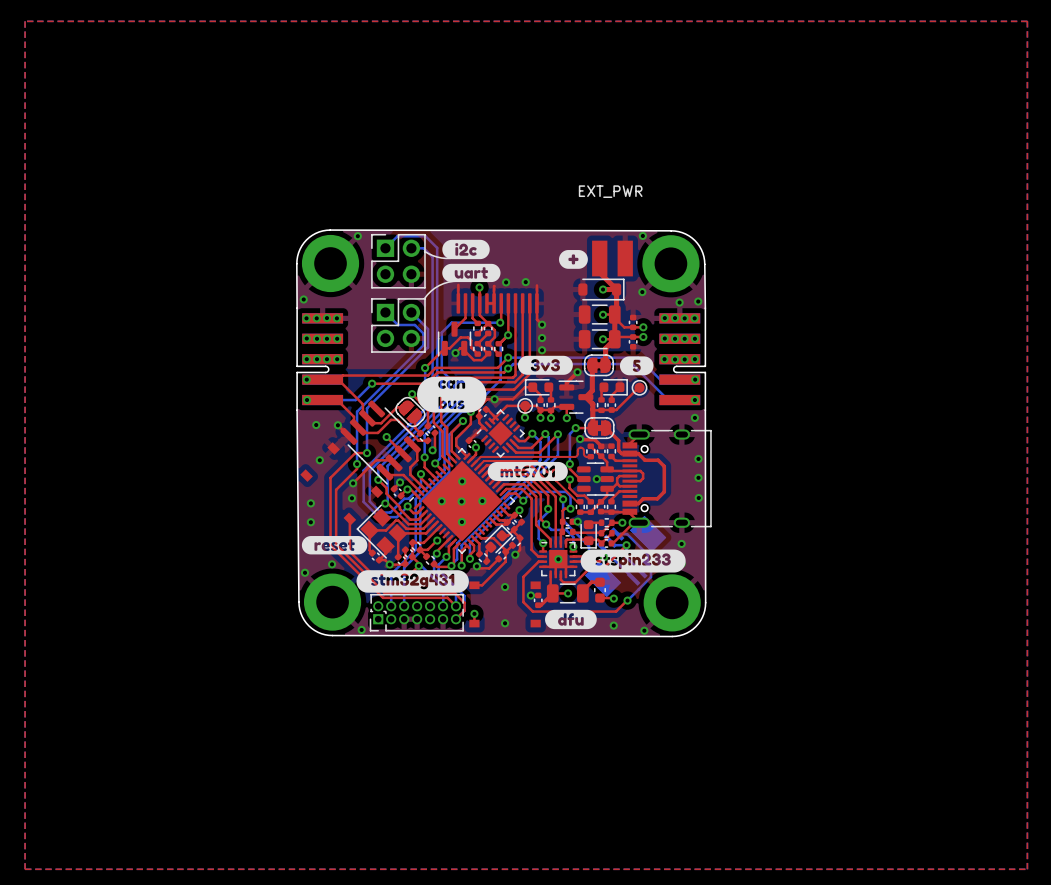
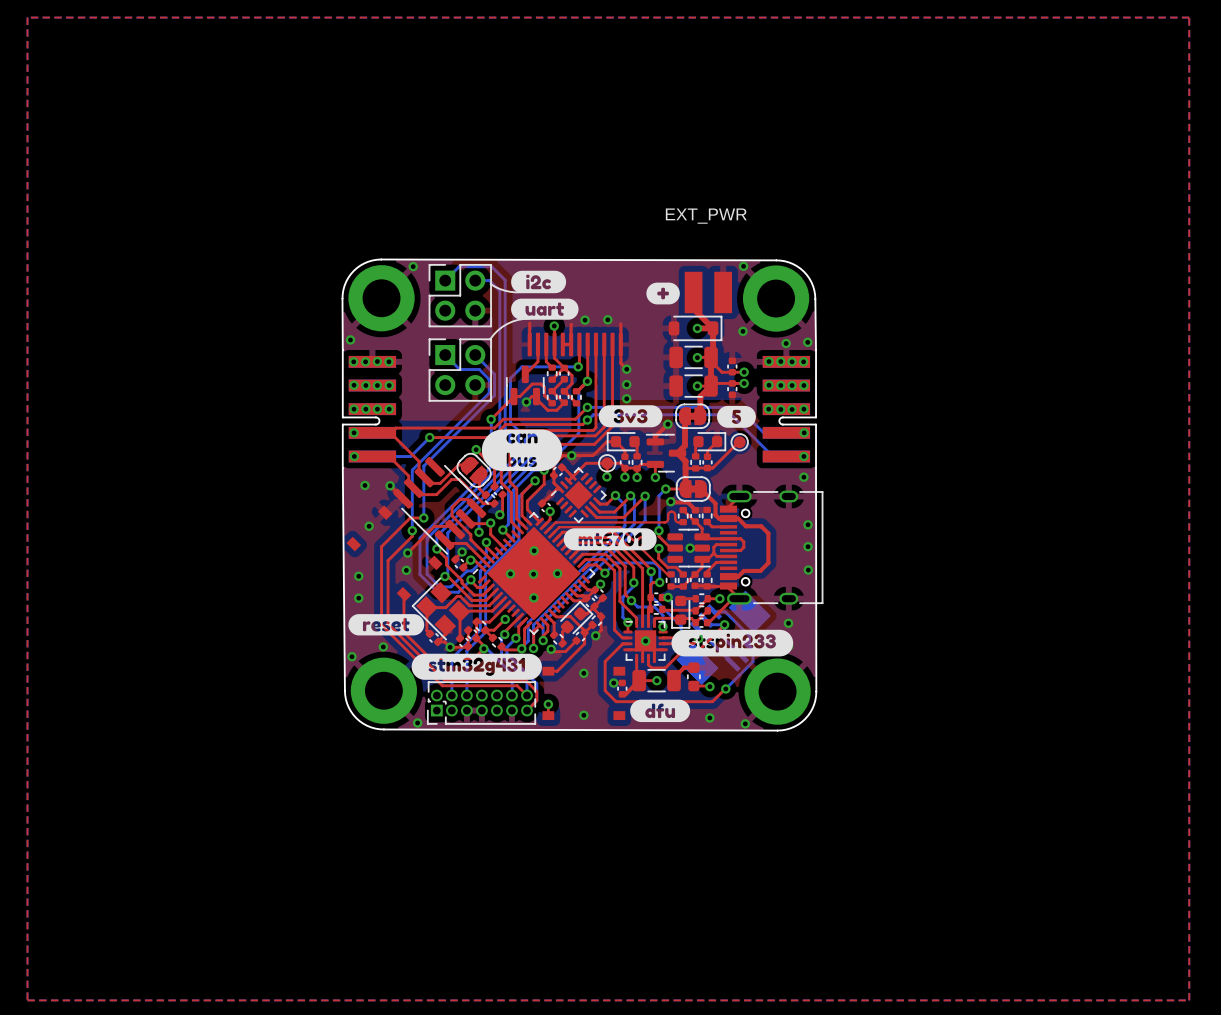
bottom track: (424, 435) (424, 457) -> (490, 497) (479, 509) (479, 532)
top track: (386, 437) (403, 453) -> (489, 523) (470, 523) (465, 518)
via position: (386, 437) -> (479, 532)
top track: (412, 444) (417, 449) (417, 460) (410, 467) (410, 474) -> (476, 508) (467, 499) (460, 499) (452, 507) (452, 515) (470, 534) (470, 539) (474, 543)

